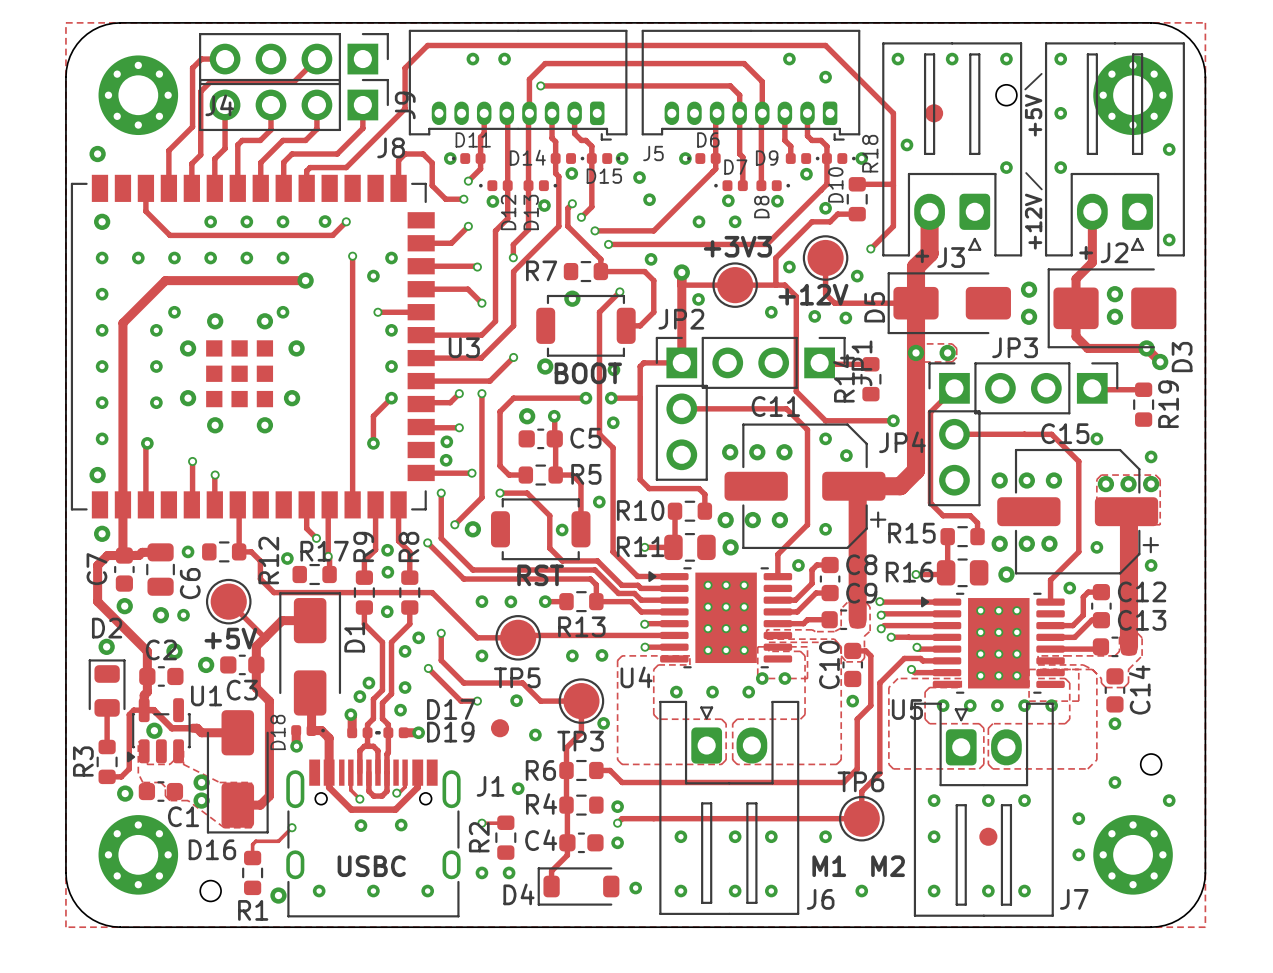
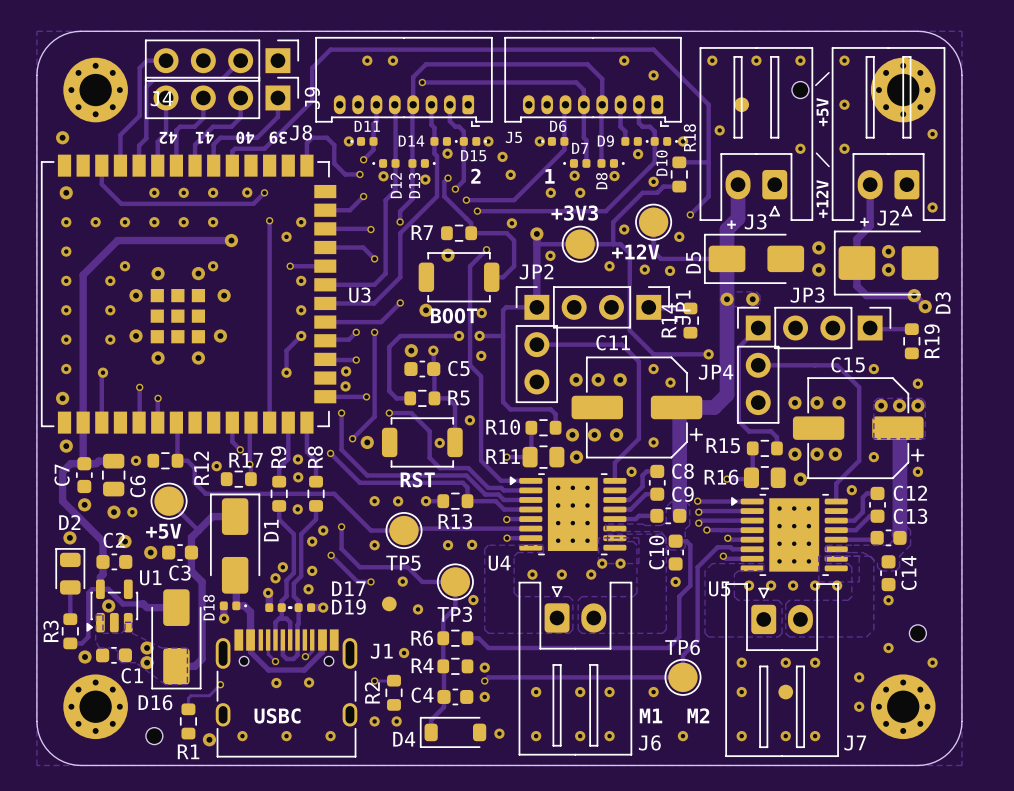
text: none -> 39 (278, 137)
text: none -> 42 (168, 137)
text: none -> 41 (204, 137)
text: none -> 40 (245, 137)
text: none -> 2 (475, 176)
text: none -> 1 (549, 176)

